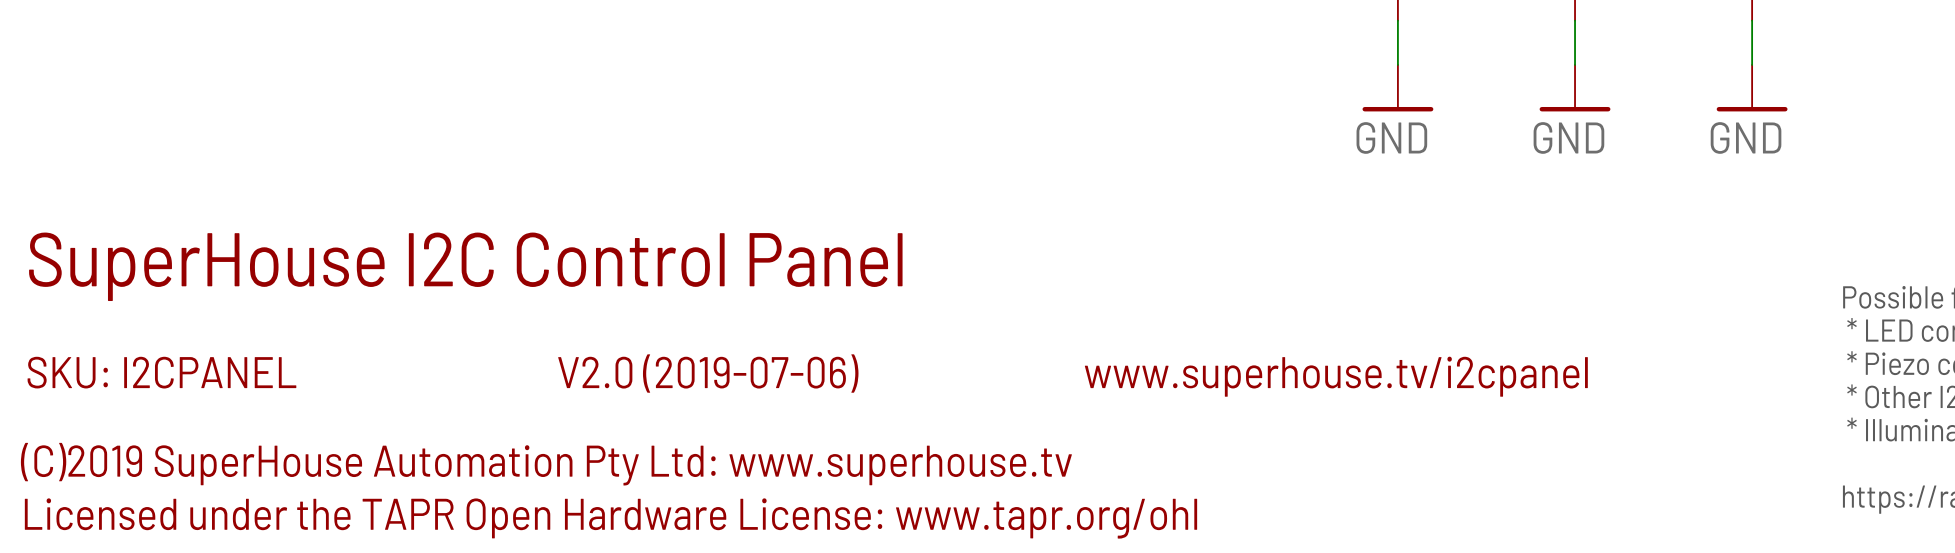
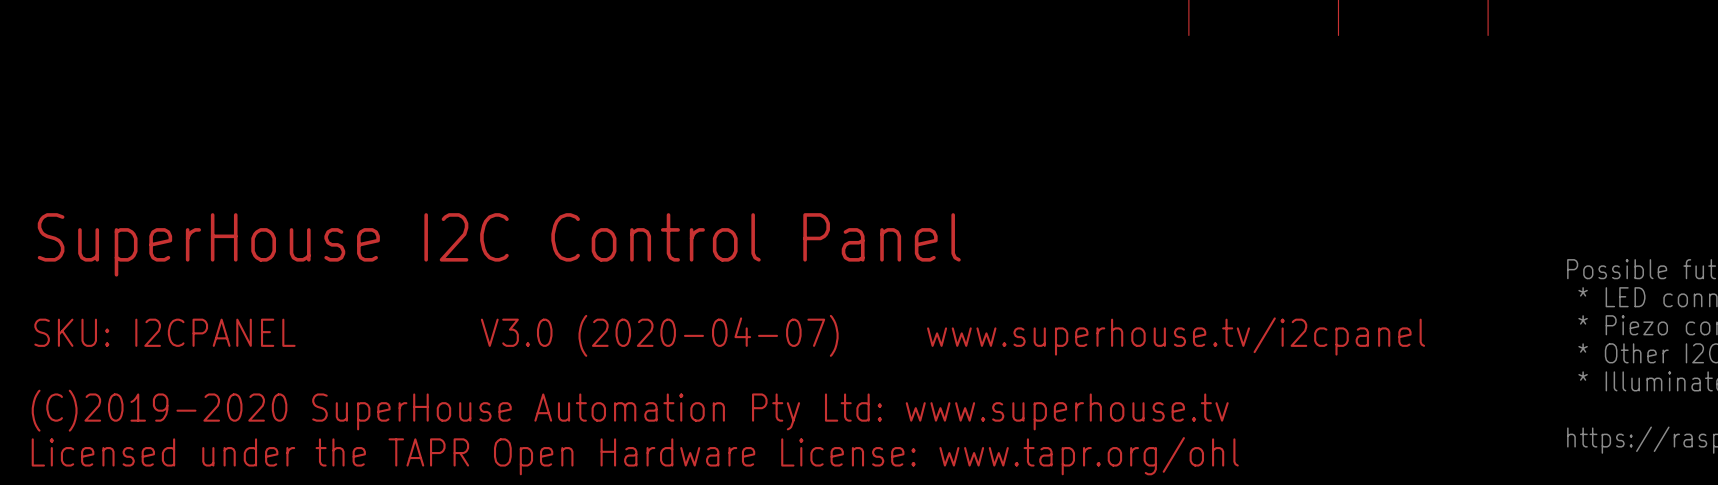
wire: (1397, 20) (1397, 64) -> none
wire: (1575, 20) (1575, 64) -> none
wire: (1752, 20) (1752, 64) -> none
power symbol: GND (1397, 88) -> none
power symbol: GND (1575, 88) -> none
power symbol: GND (1752, 88) -> none
text: V2.0 (2019-07-06) (708, 373) -> V3.0 (2020-04-07) (659, 335)
text: (C)2019 SuperHouse Automation Pty Ltd: www.superhouse.tv (546, 464) -> (C)2019-2020 SuperHouse Automation Pty Ltd: www.superhouse.tv (630, 410)

